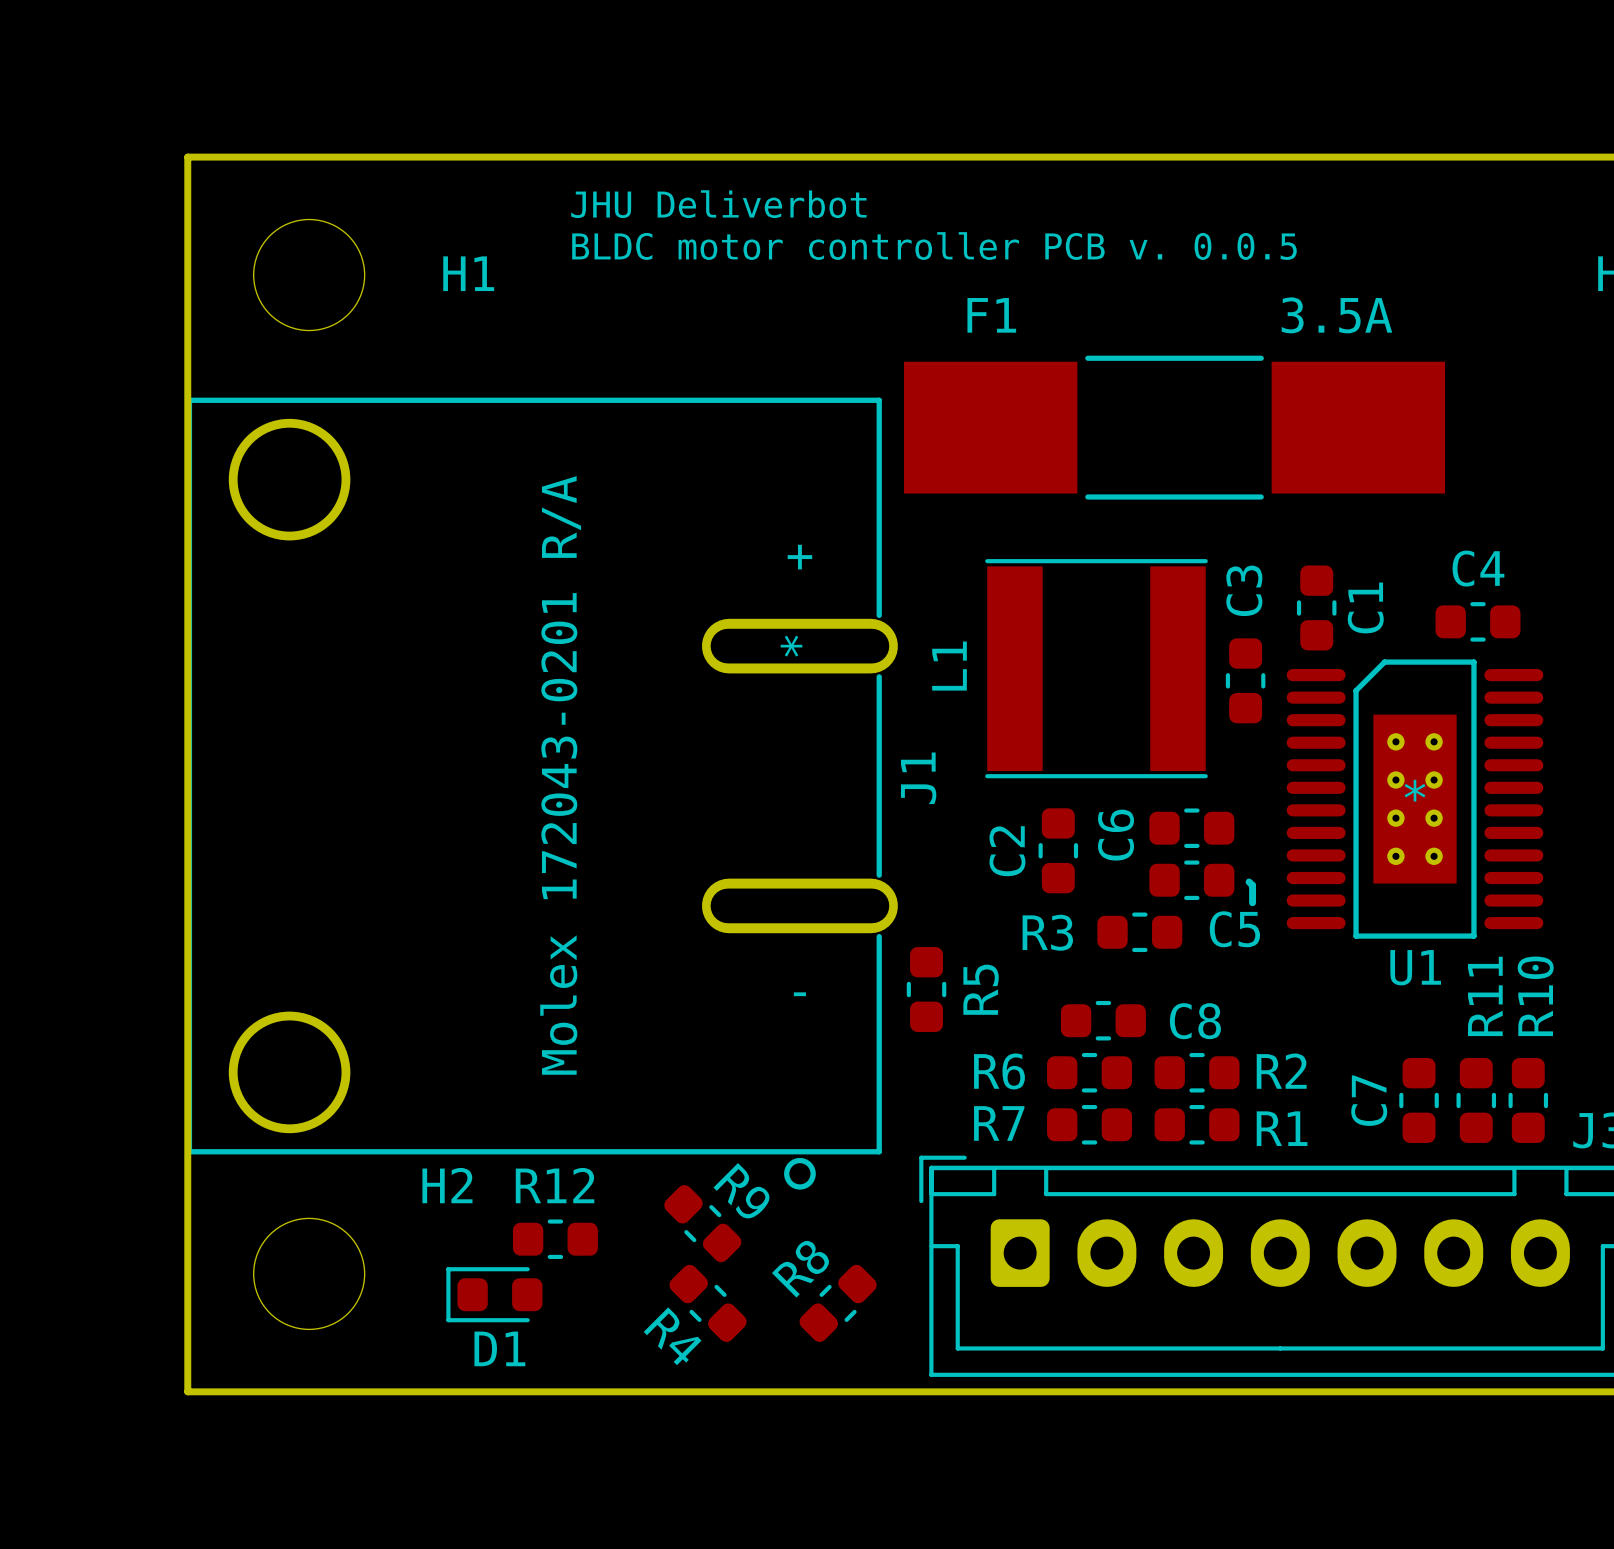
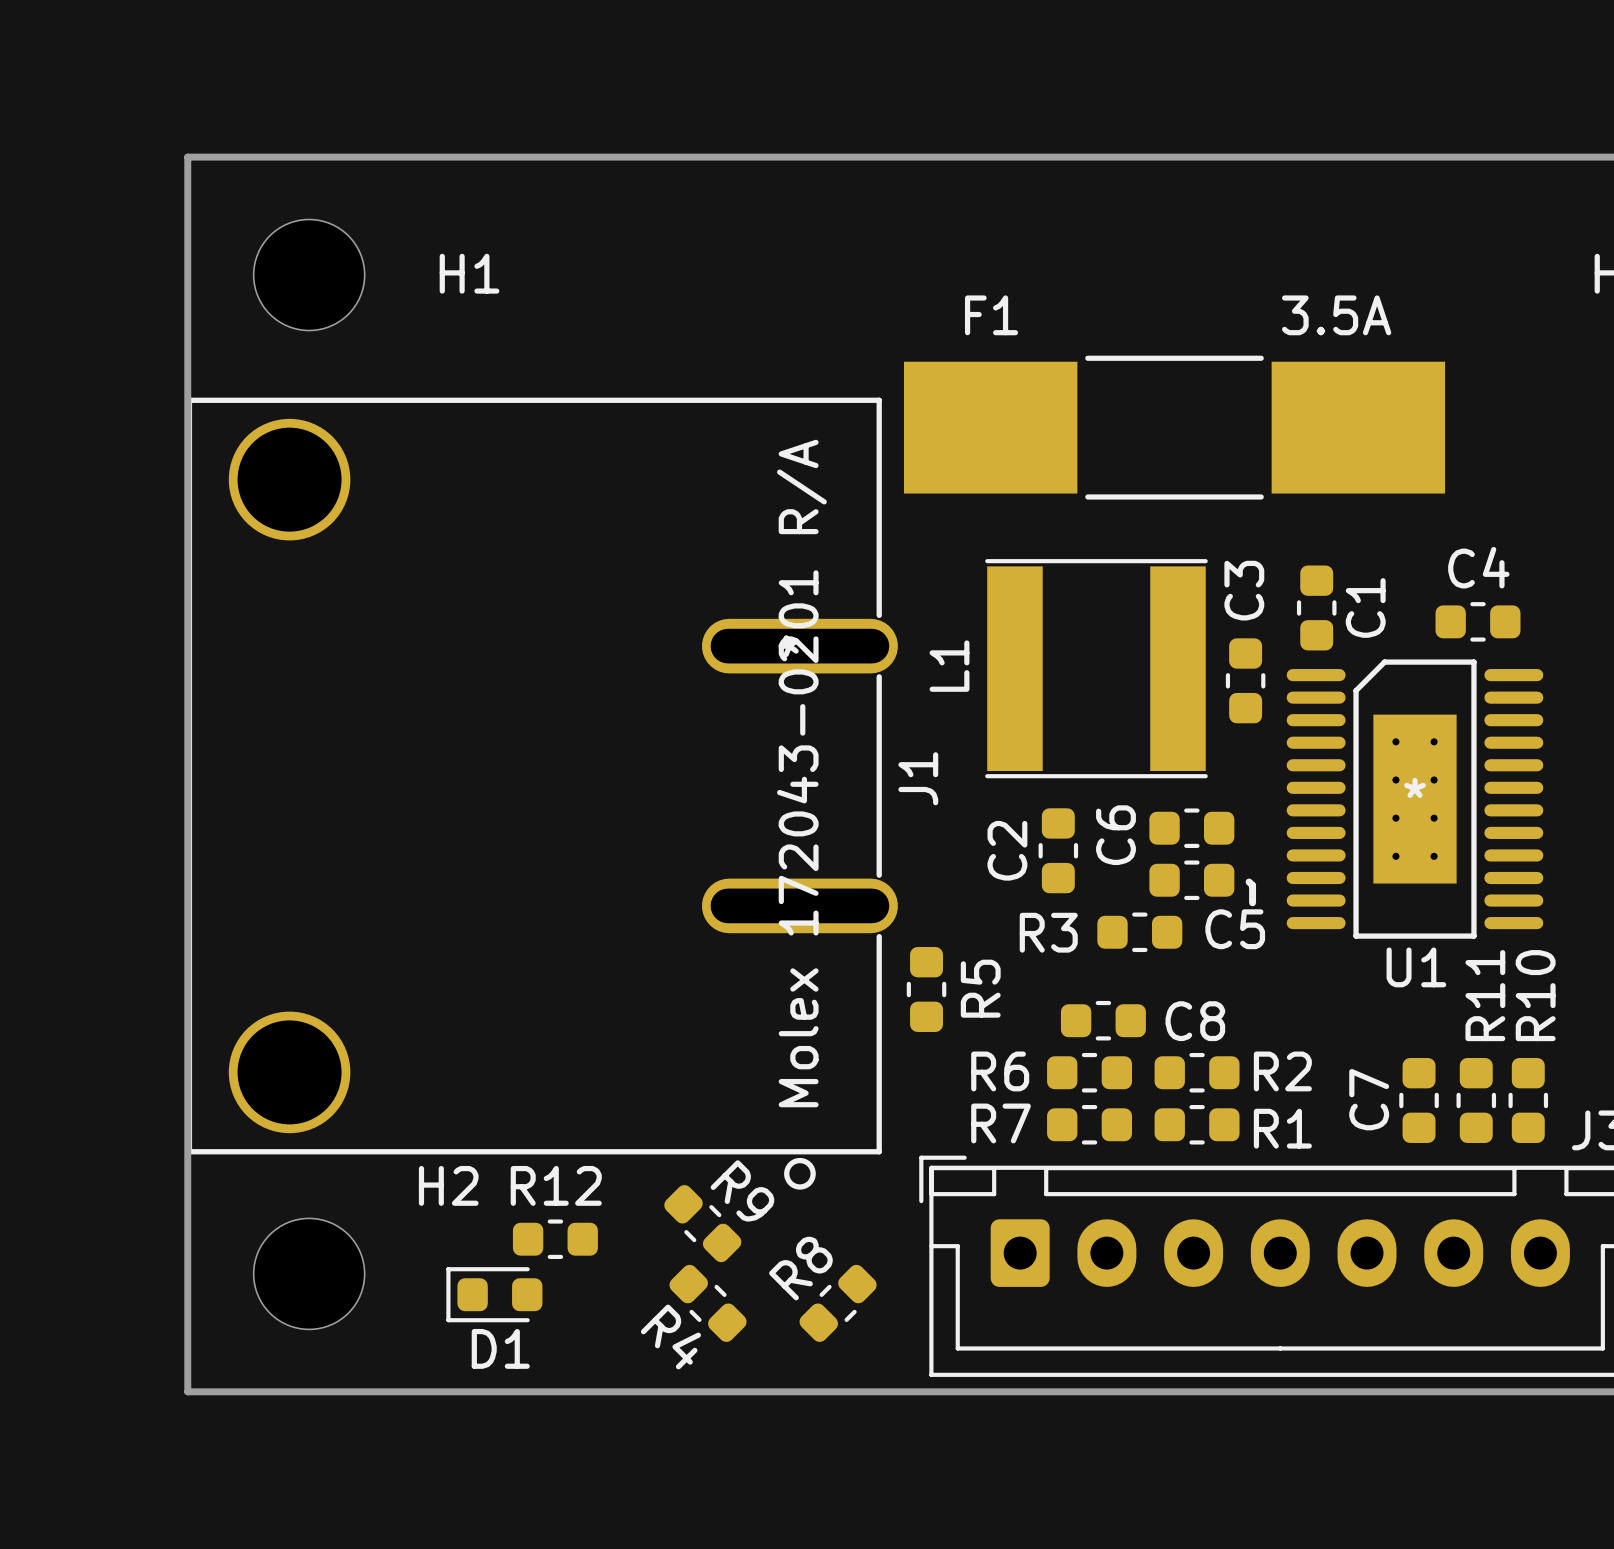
text: JHU Deliverbot (718, 204) -> none
text: BLDC motor controller PCB v. 0.0.5 (934, 246) -> none
text: + (799, 557) -> none
J1 value position: Molex 172043-0201 R/A (560, 775) -> Molex 172043-0201 R/A (801, 773)
text: - (799, 994) -> none

